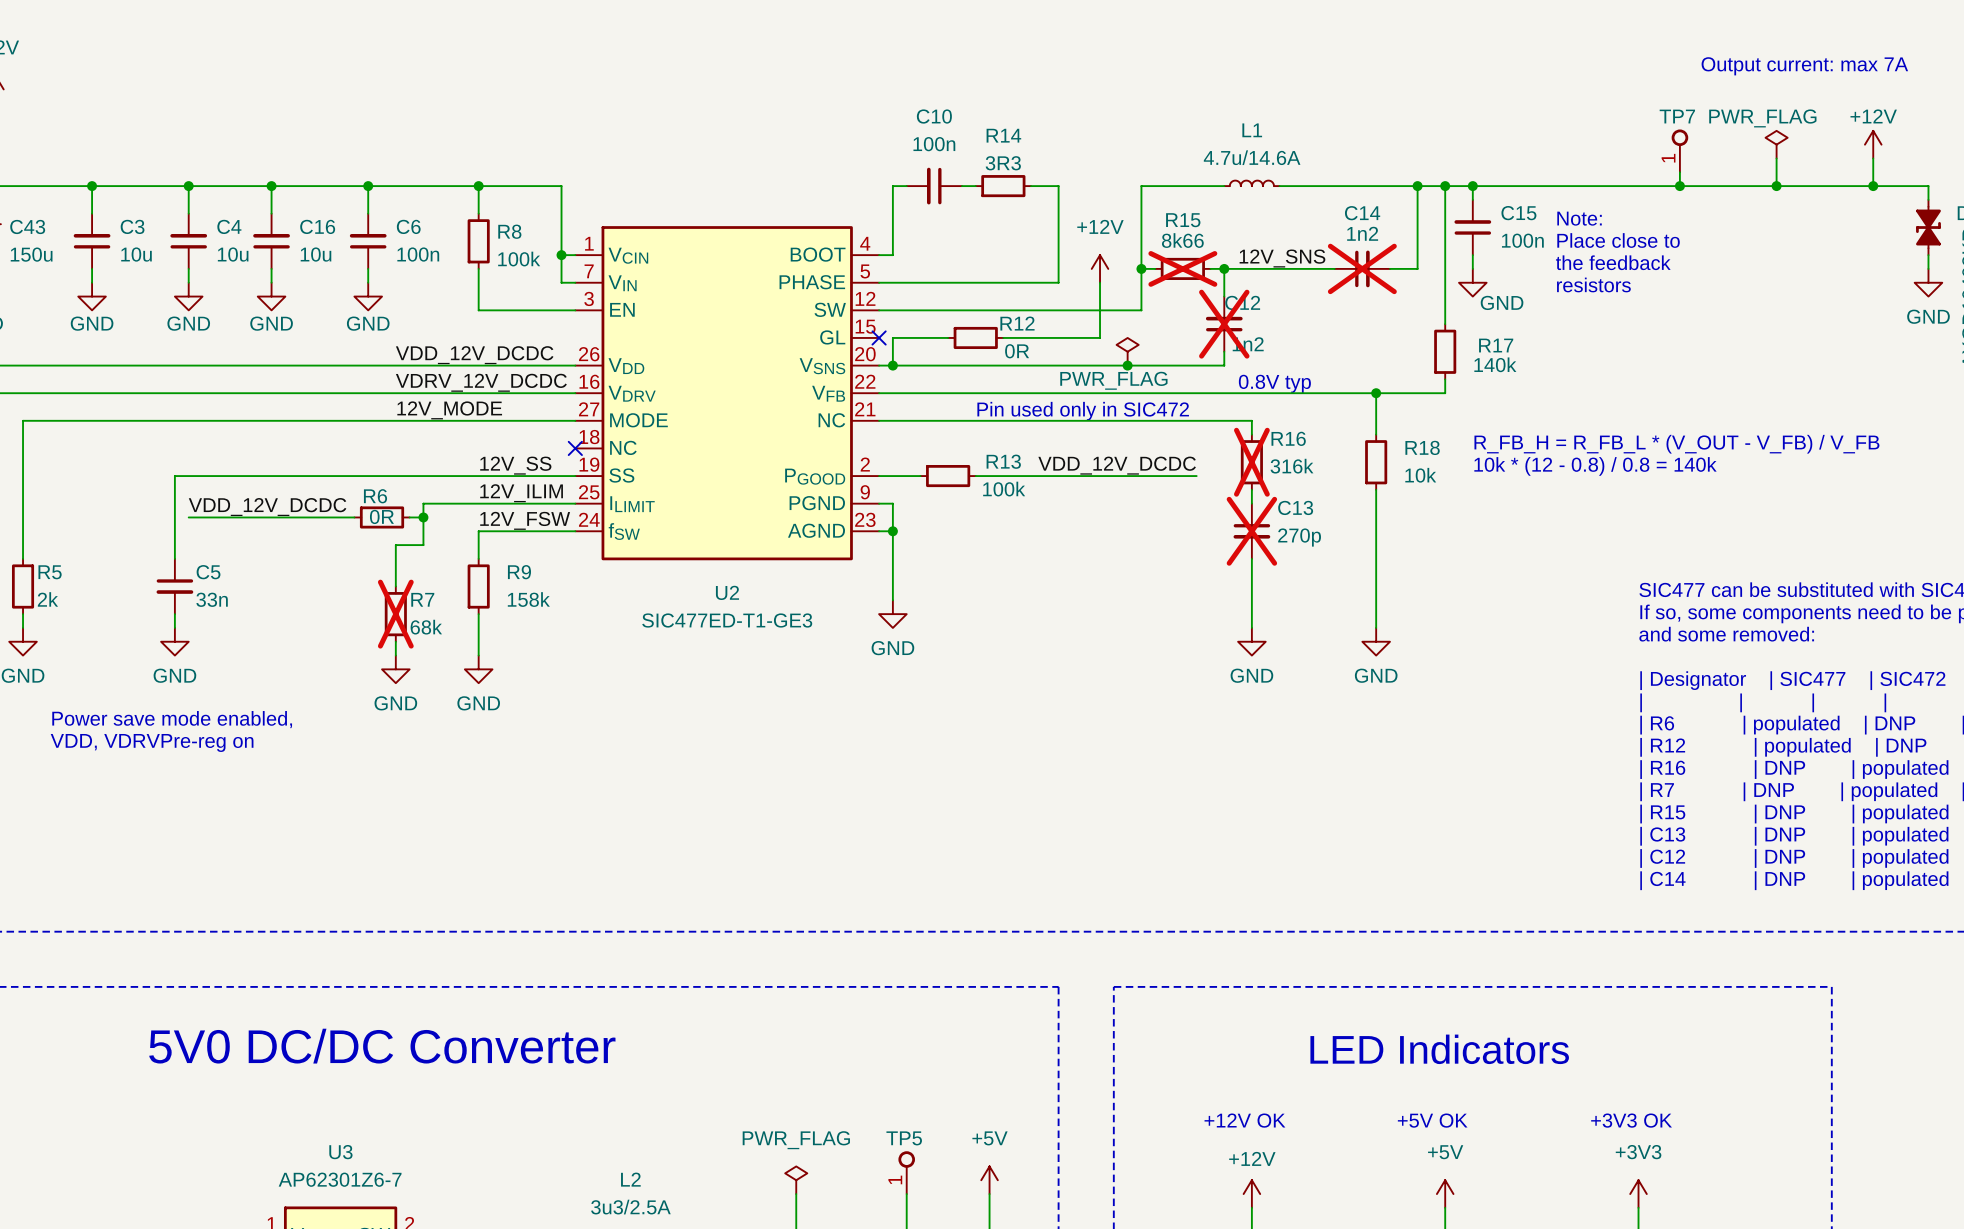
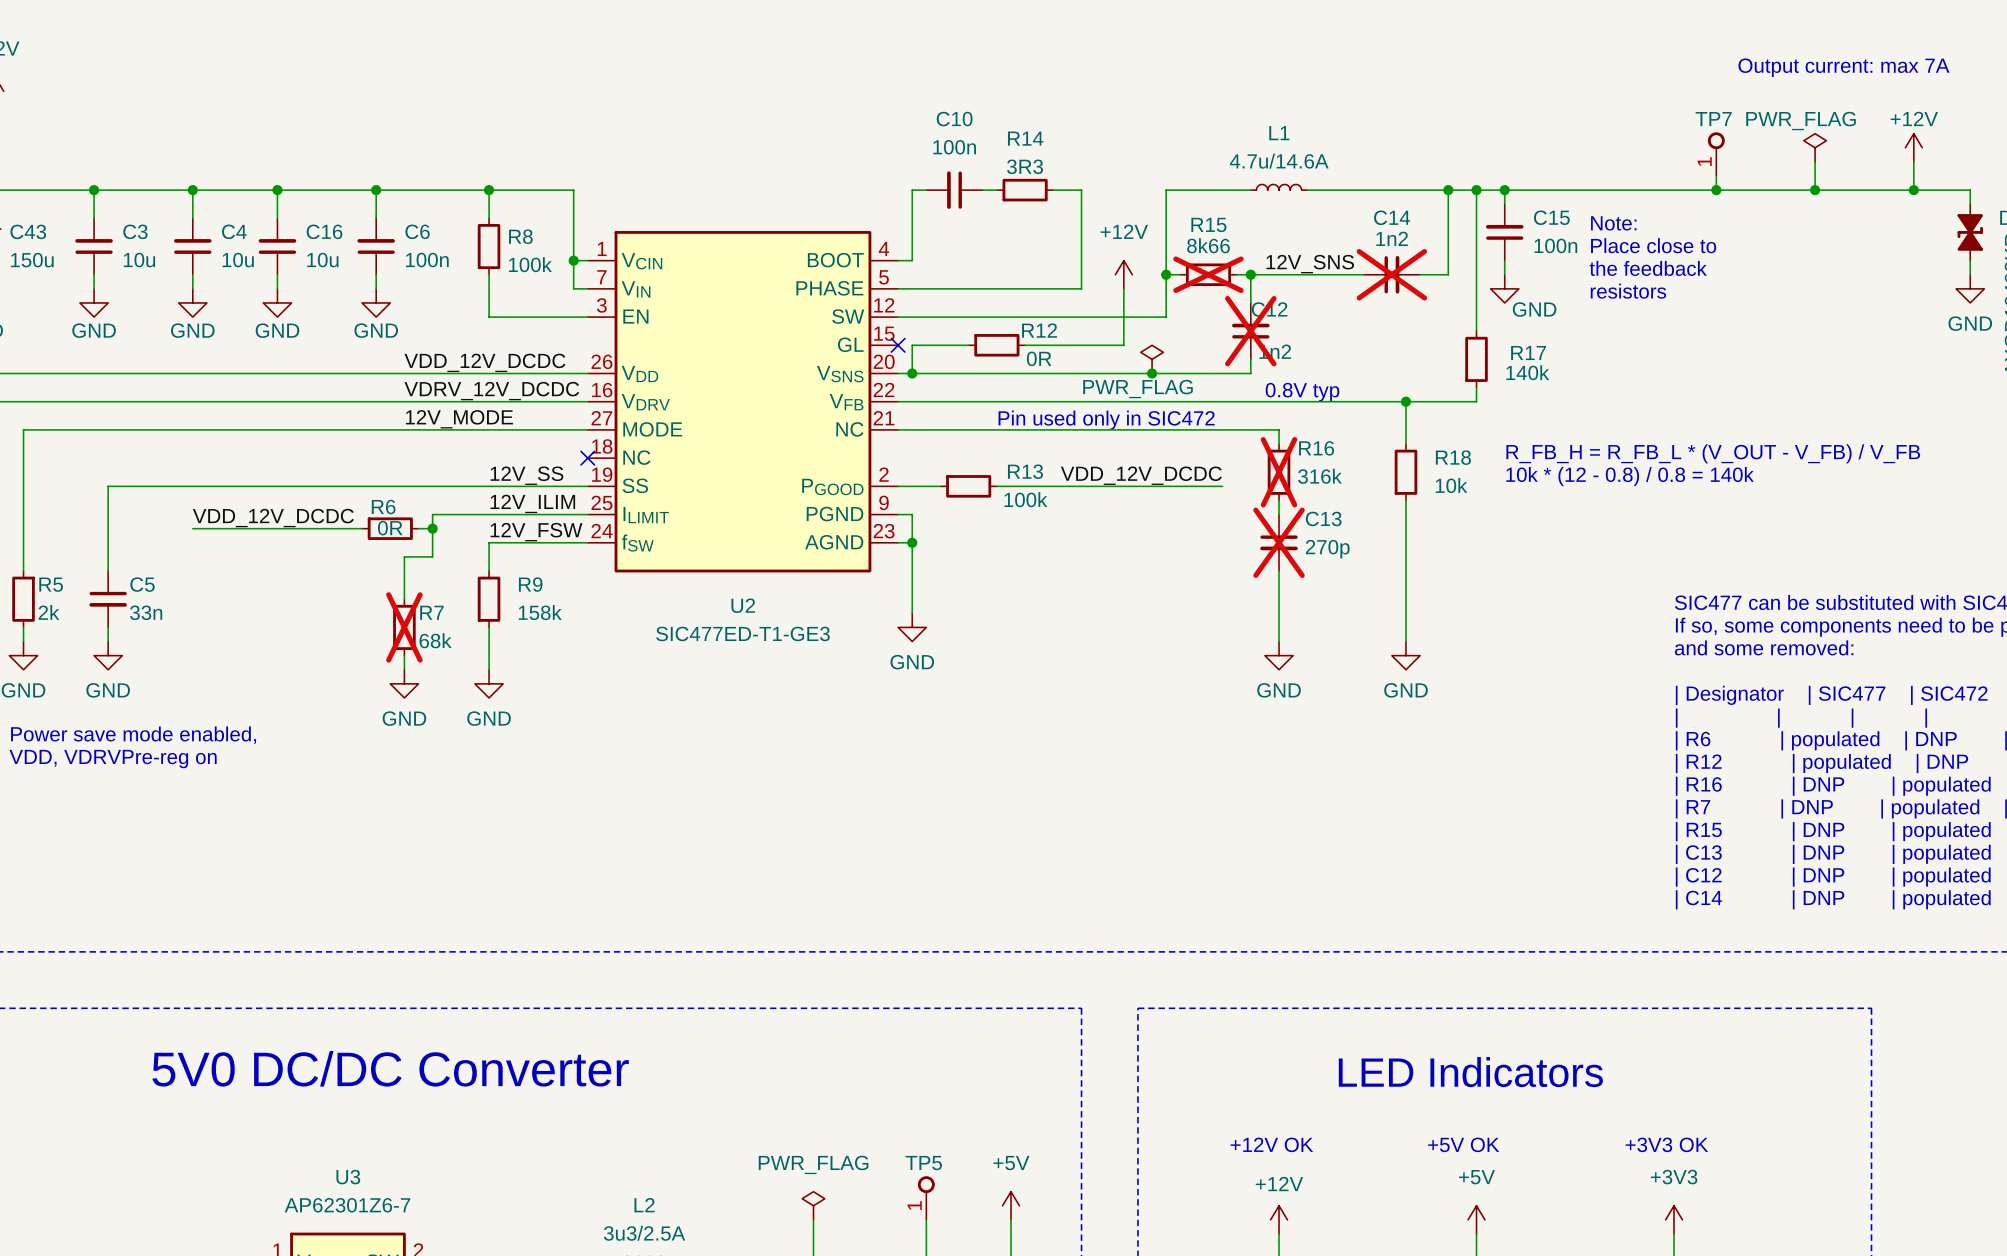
wire: (174, 476) (174, 558) -> (178, 486) (108, 486) (108, 571)
C5 position: (174, 586) -> (108, 599)
wire: (174, 614) (174, 627) -> (108, 627) (108, 641)
power symbol position: GND (174, 641) -> GND (108, 655)
text position: Power save mode enabled, (172, 719) -> Power save mode enabled, (133, 735)
text position: VDD, VDRVPre-reg on (152, 742) -> VDD, VDRVPre-reg on (113, 759)

